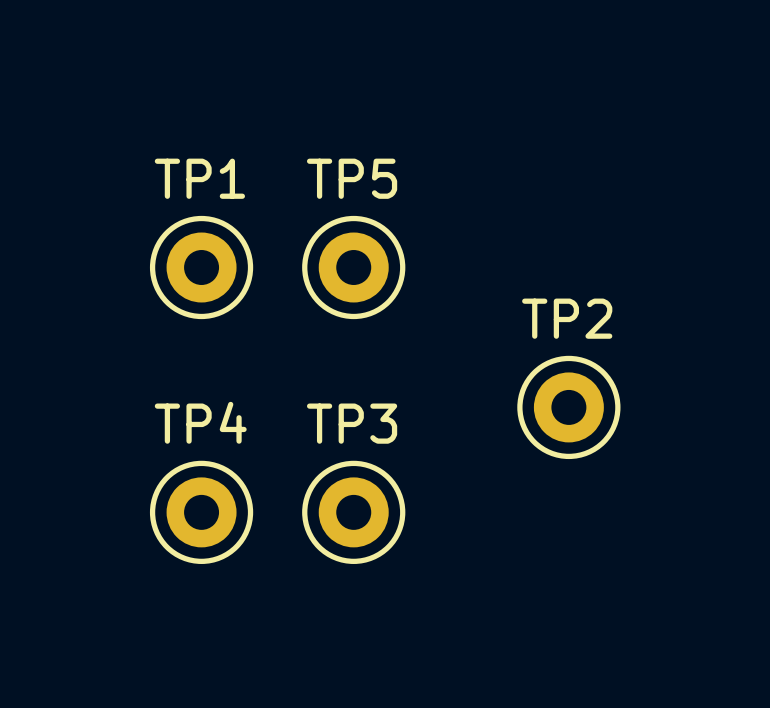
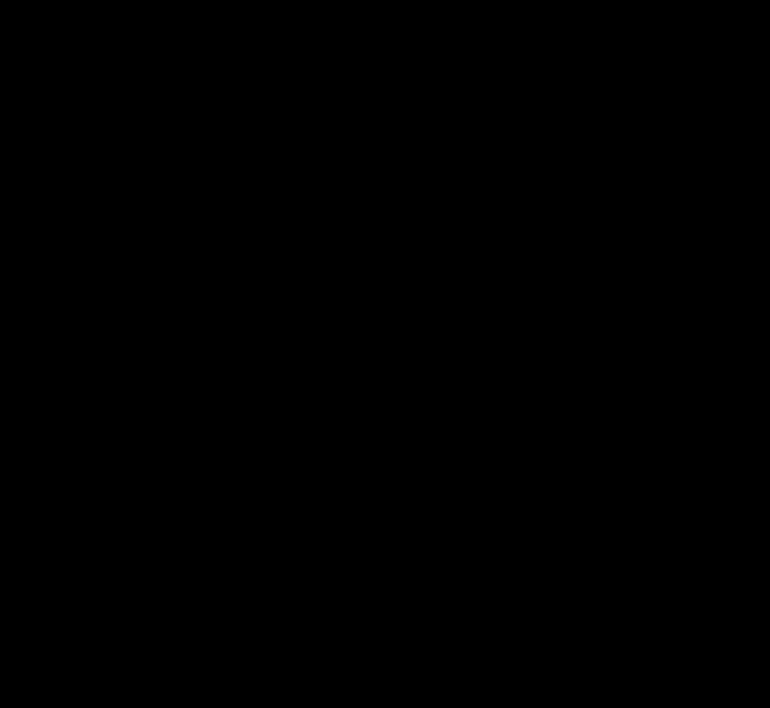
TP1: (201, 267) -> none
TP5: (353, 267) -> none
TP2: (568, 407) -> none
TP4: (201, 512) -> none
TP3: (353, 512) -> none

